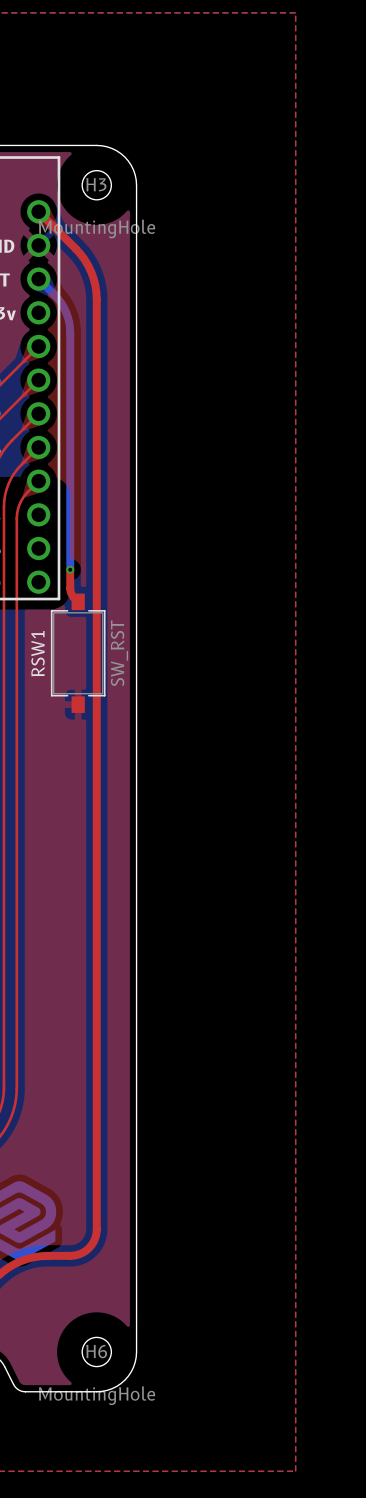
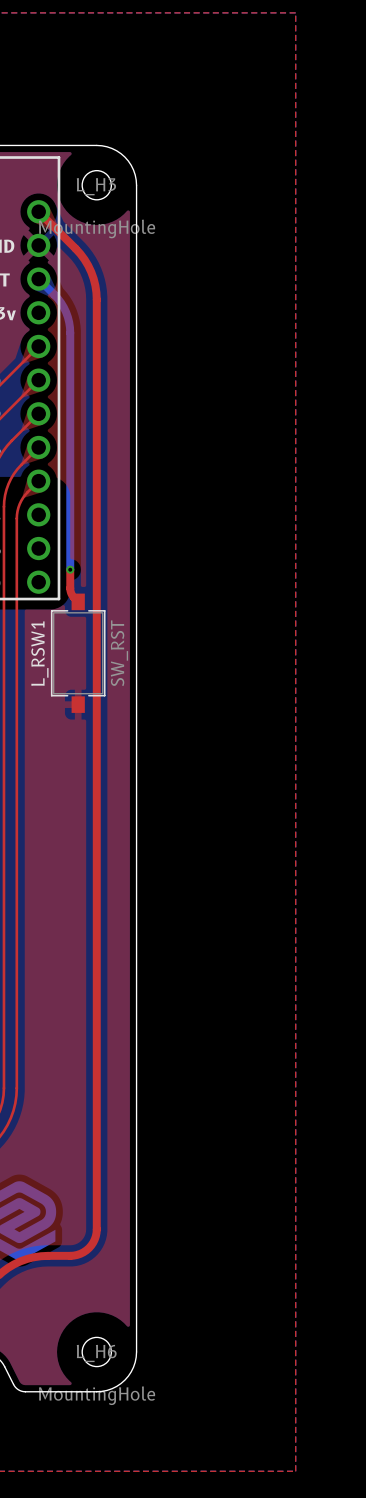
H3 name: H3 (96, 184) -> L_H3 (96, 186)
RSW1 name: RSW1 (38, 653) -> L_RSW1 (39, 653)
H6 name: H6 (96, 1351) -> L_H6 (96, 1353)

